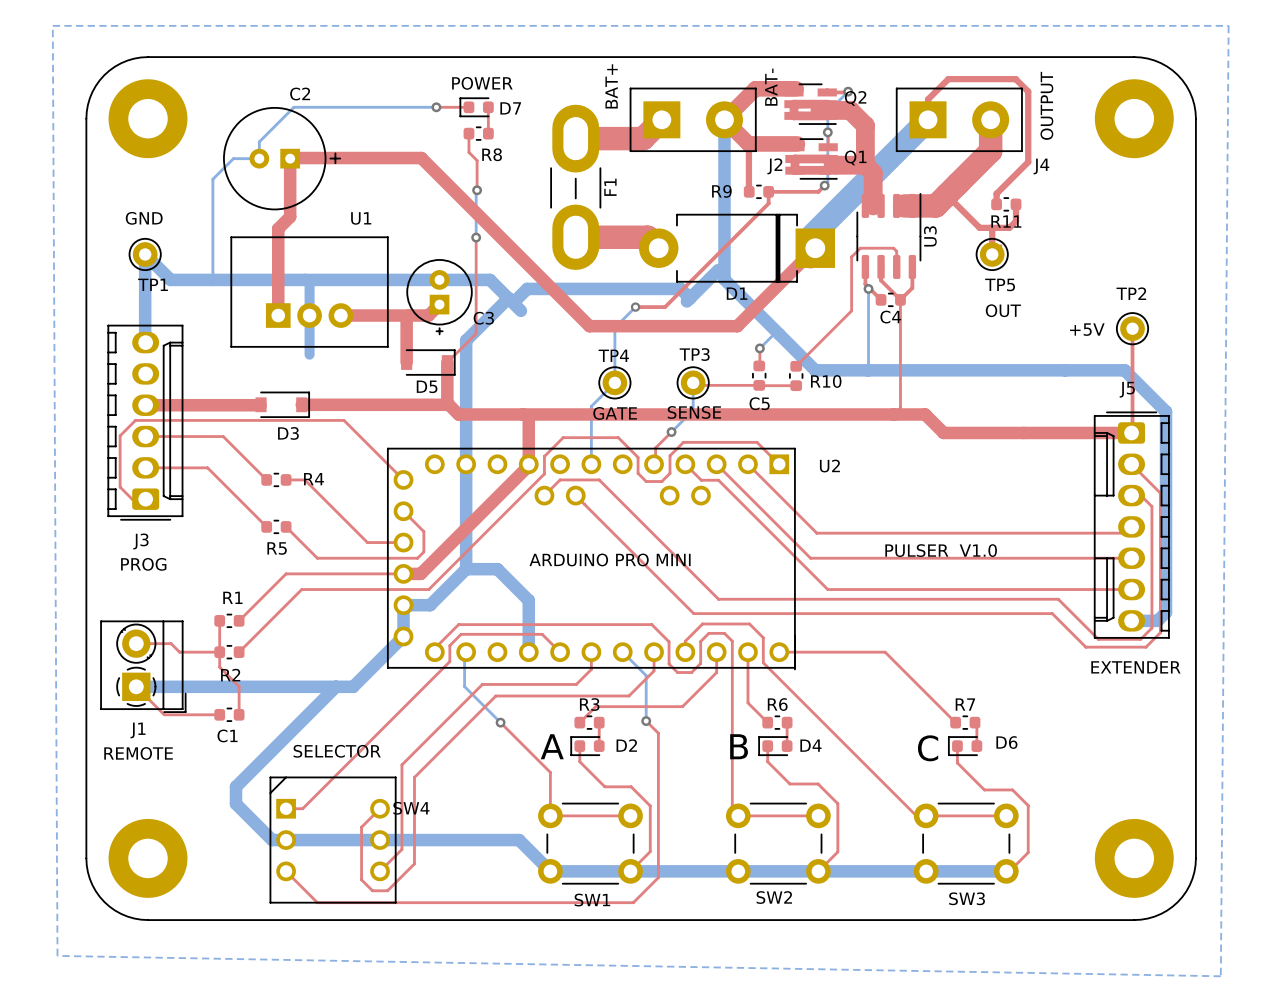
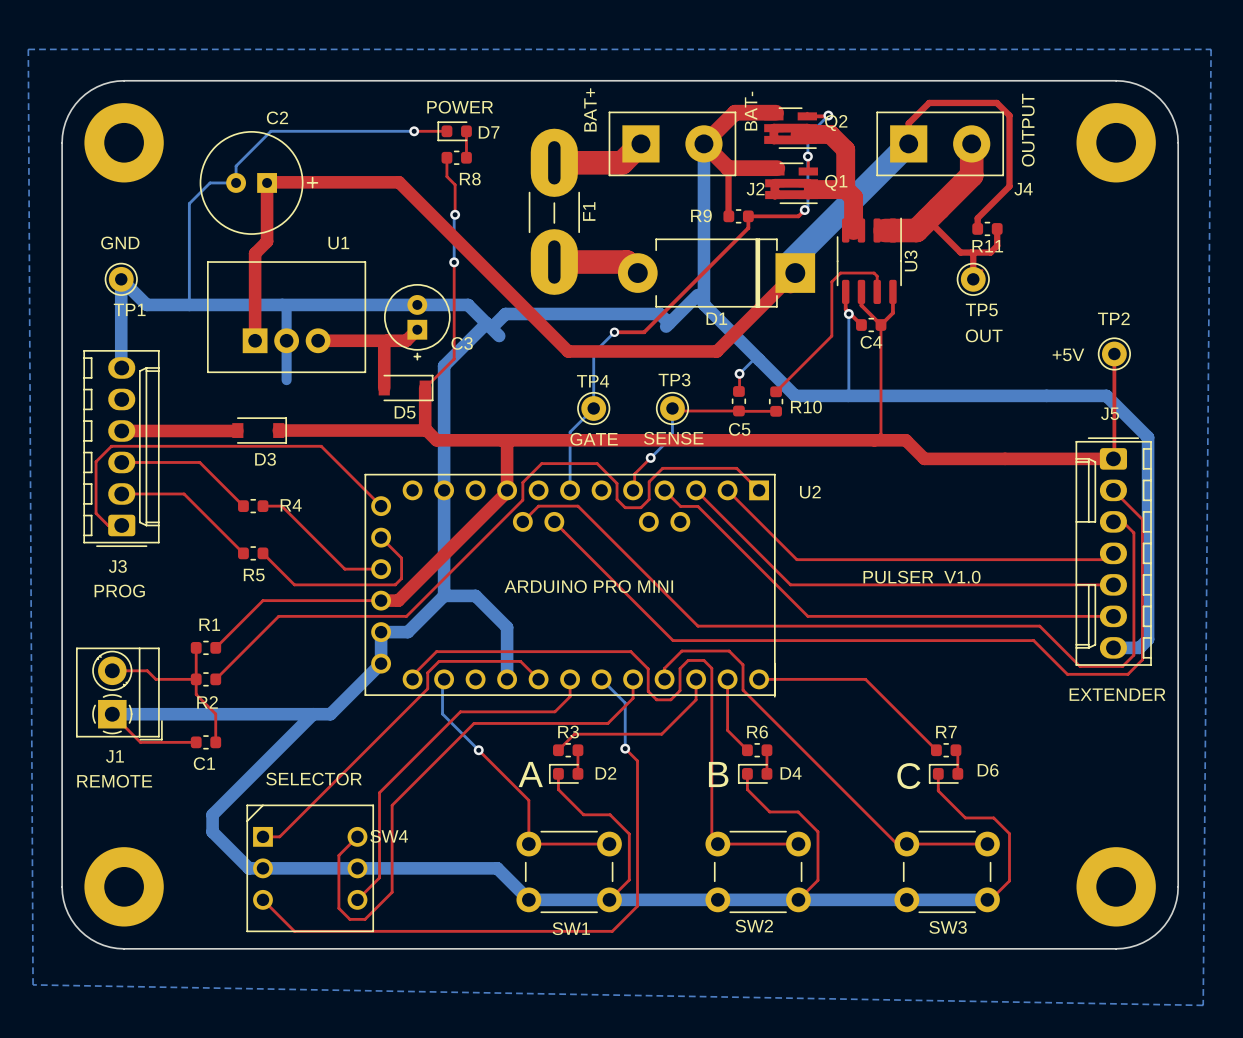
F1 footprint: [550, 104, 602, 270] -> [528, 128, 580, 295]

